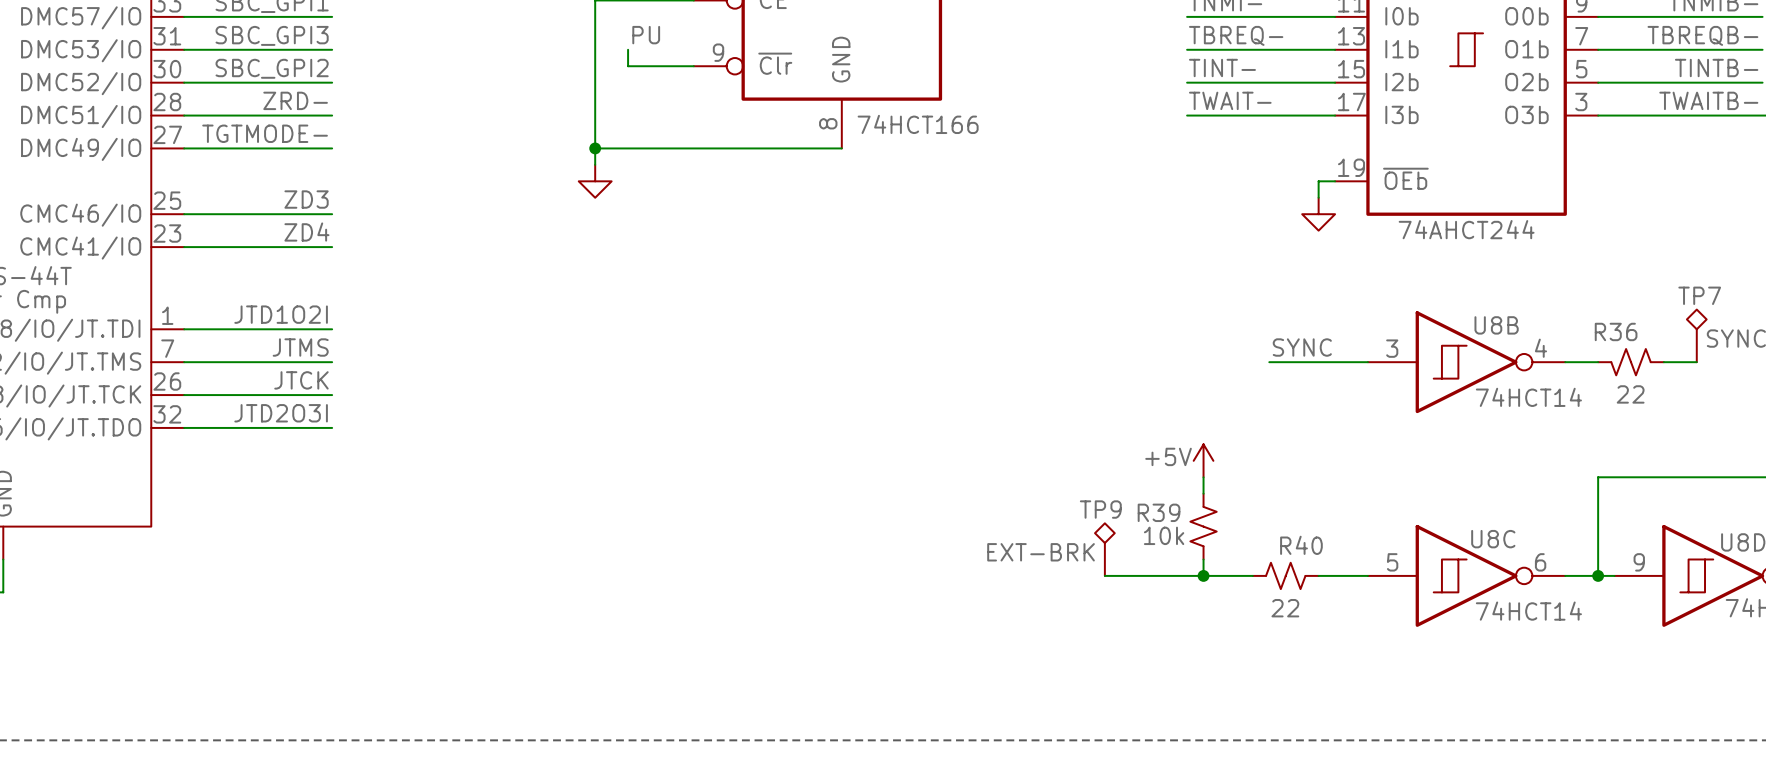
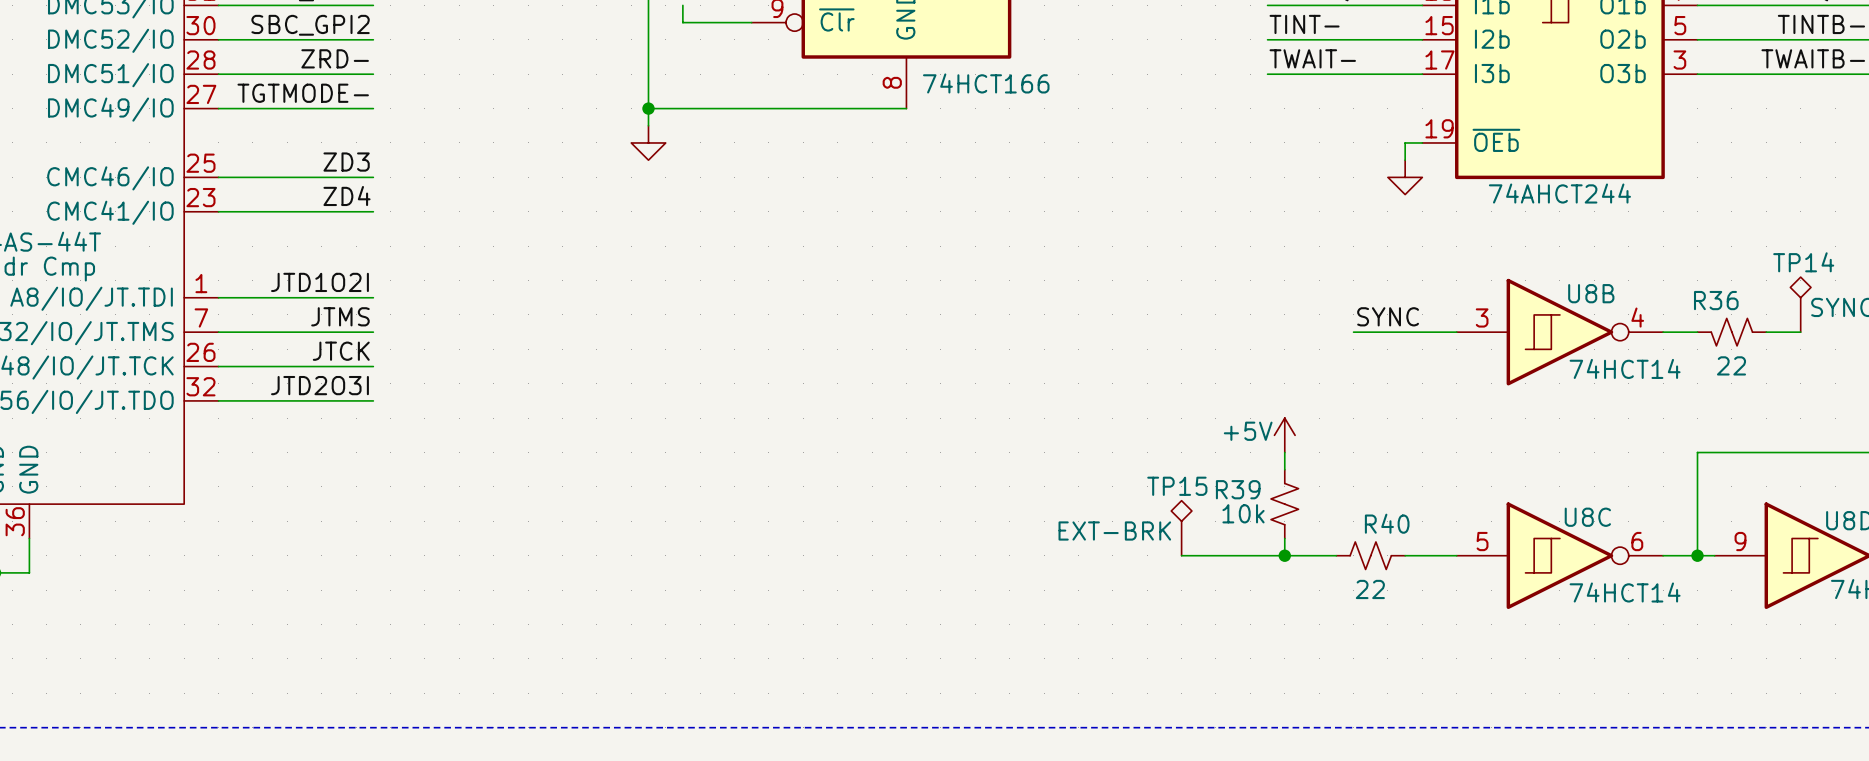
TP7 name: TP7 (1699, 295) -> TP14 (1803, 262)
TP9 name: TP9 (1100, 509) -> TP15 (1177, 486)

